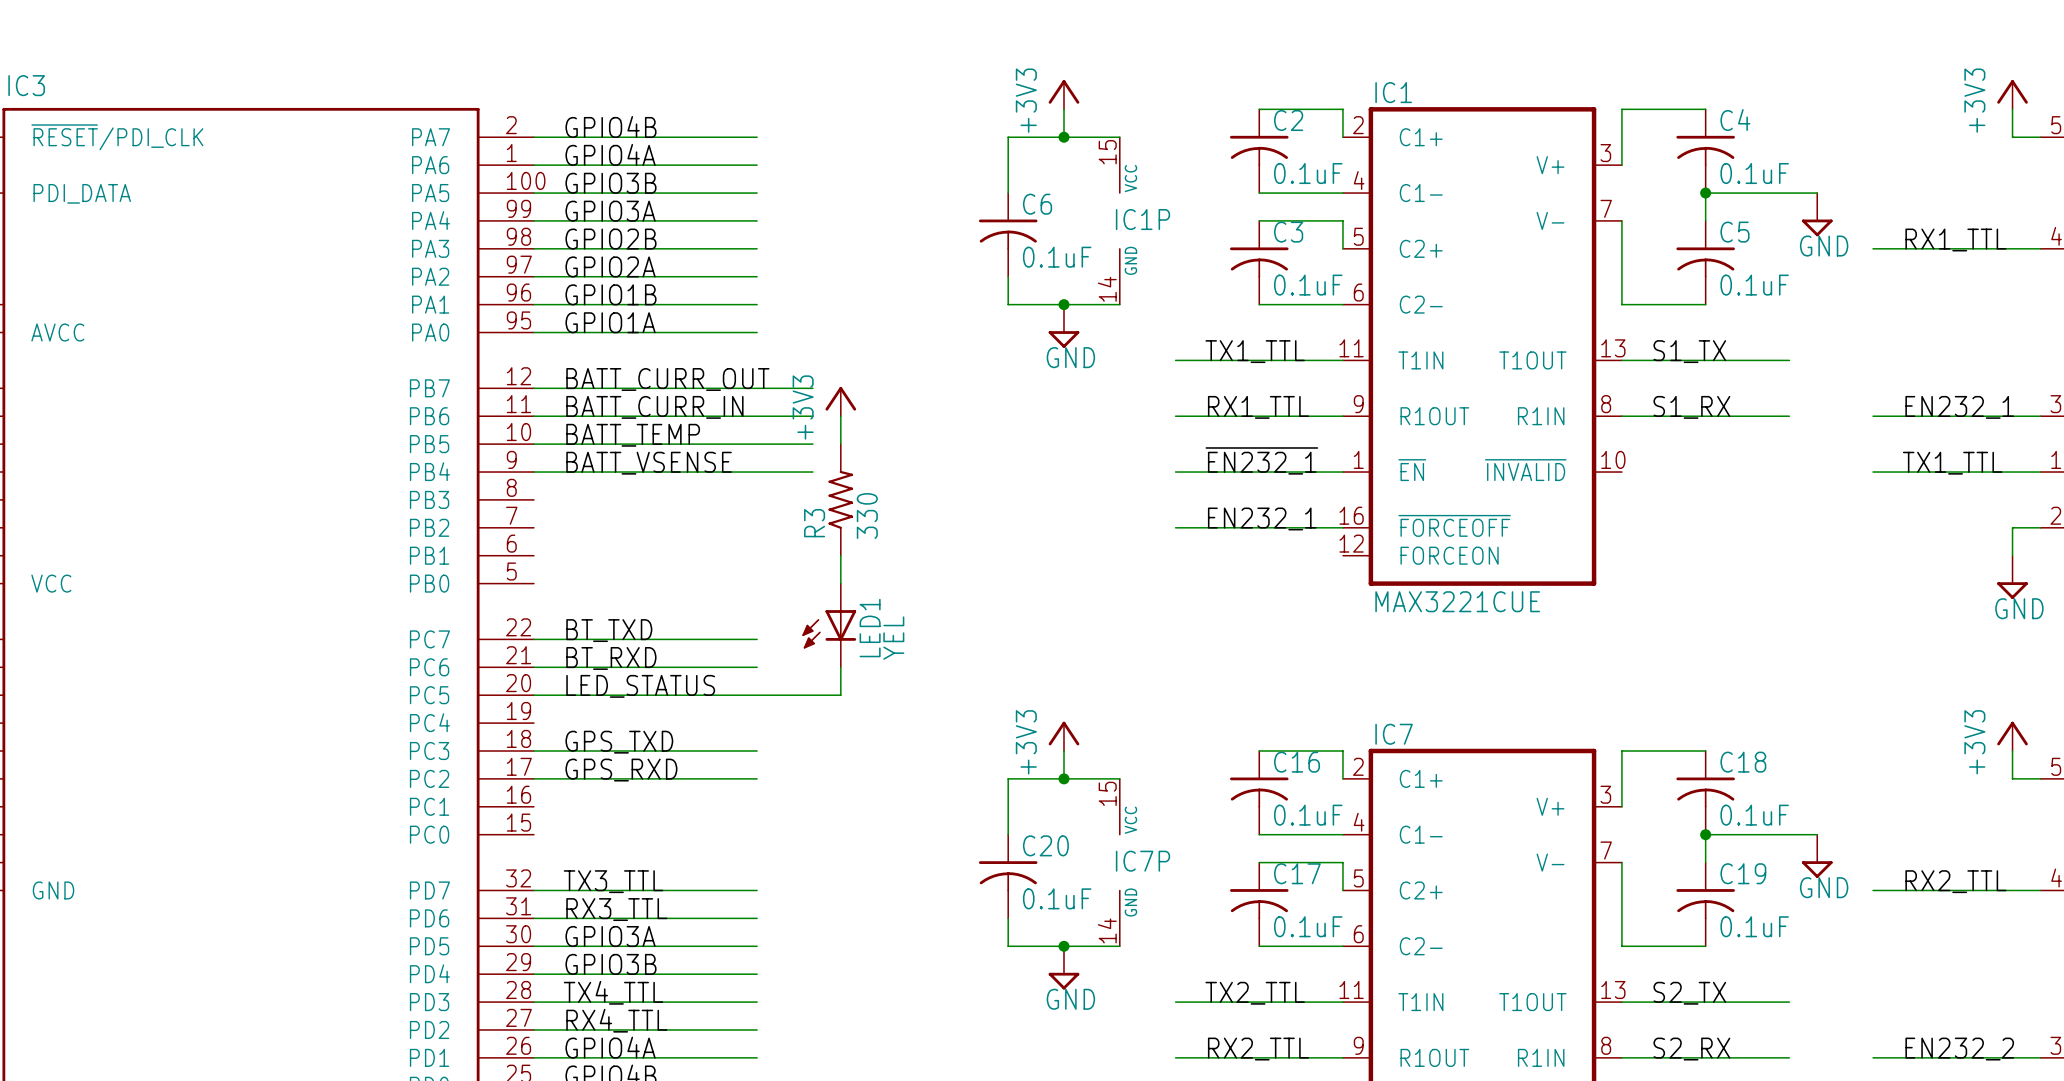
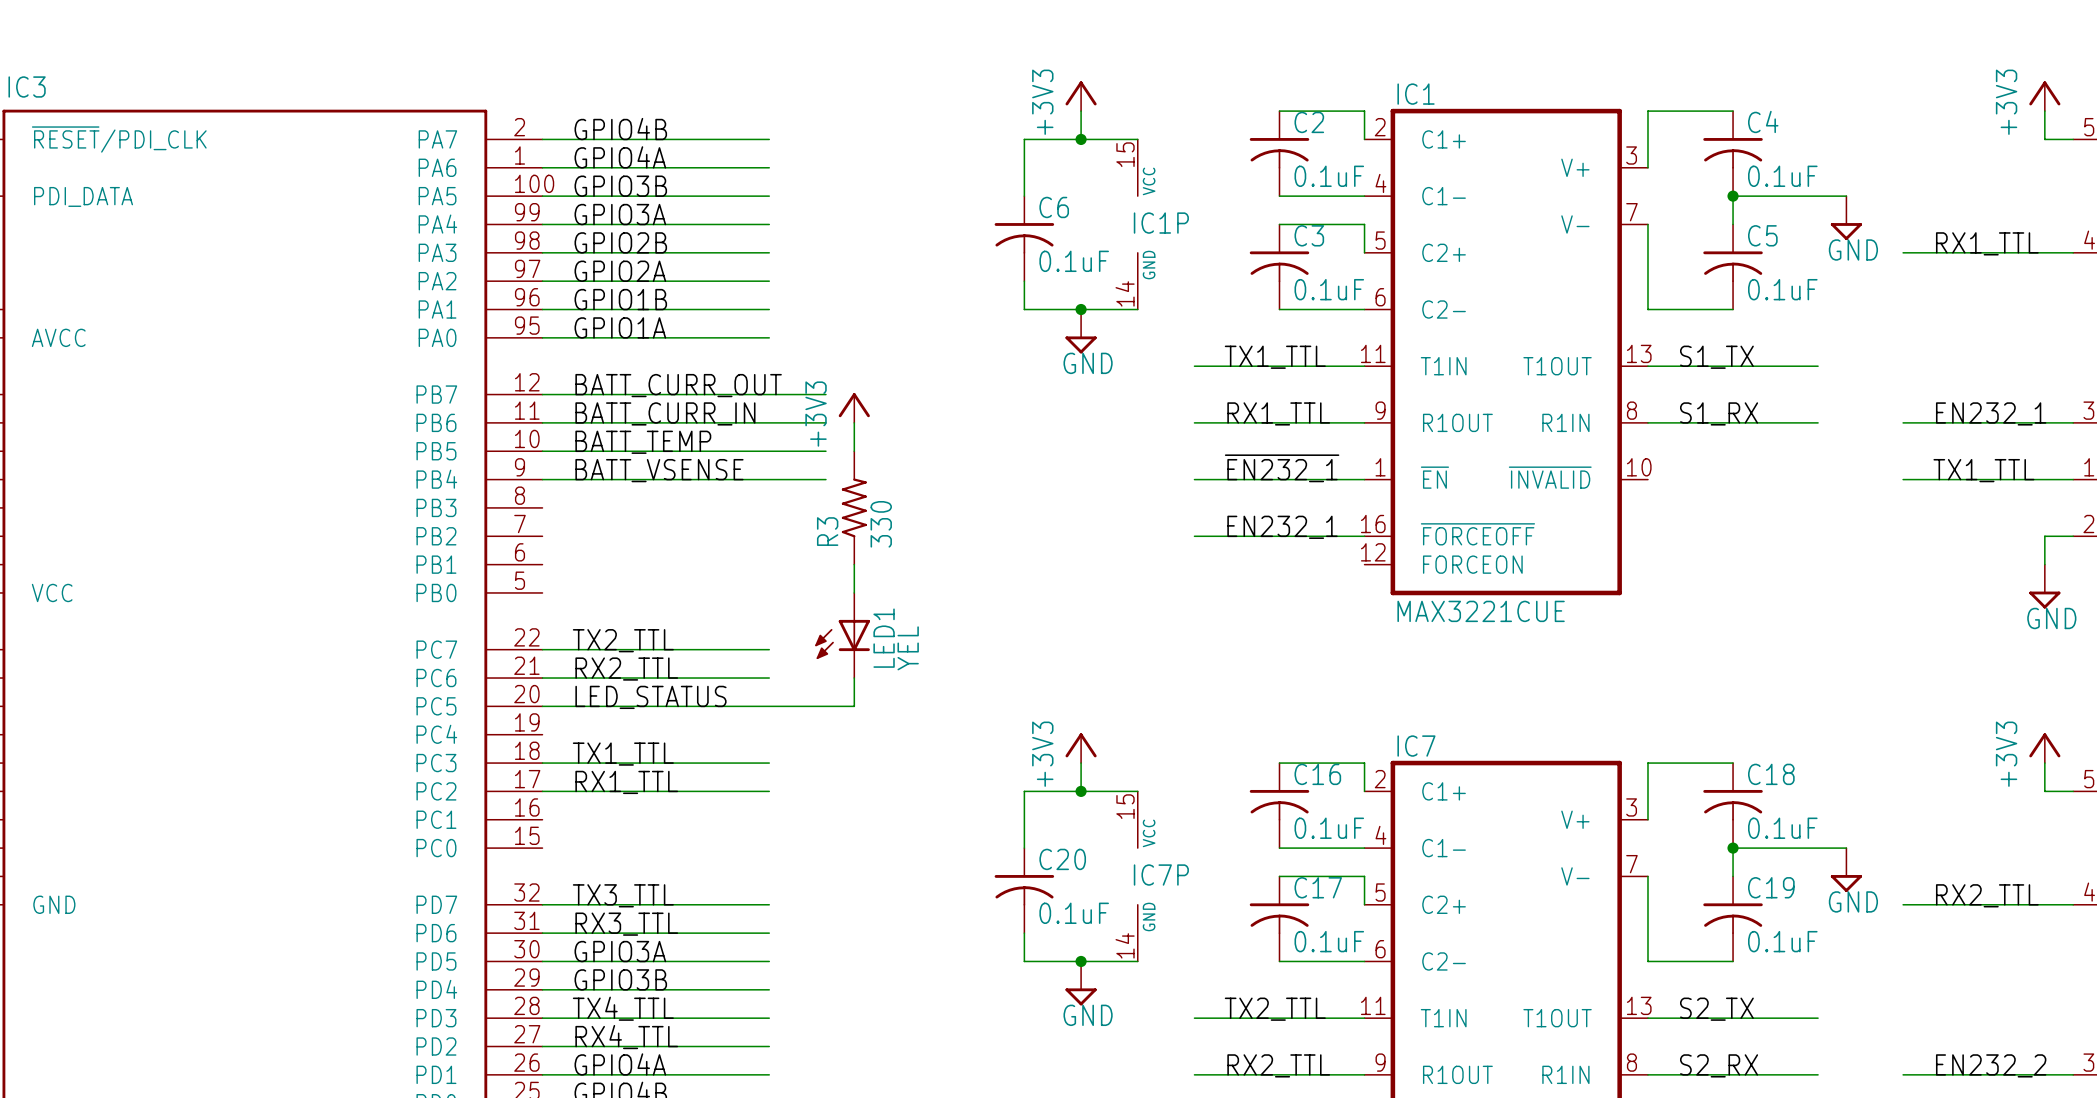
label: BT_TXD (609, 630) -> TX2_TTL (623, 640)
label: BT_RXD (611, 658) -> RX2_TTL (626, 669)
label: GPS_TXD (619, 742) -> TX1_TTL (623, 754)
label: GPS_RXD (621, 770) -> RX1_TTL (626, 782)

